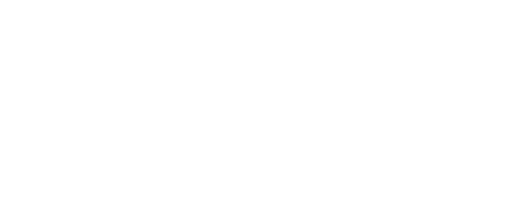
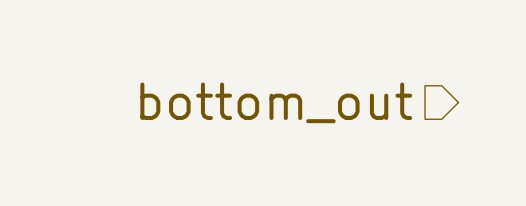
hierarchical label: none -> bottom_out (276, 102)

